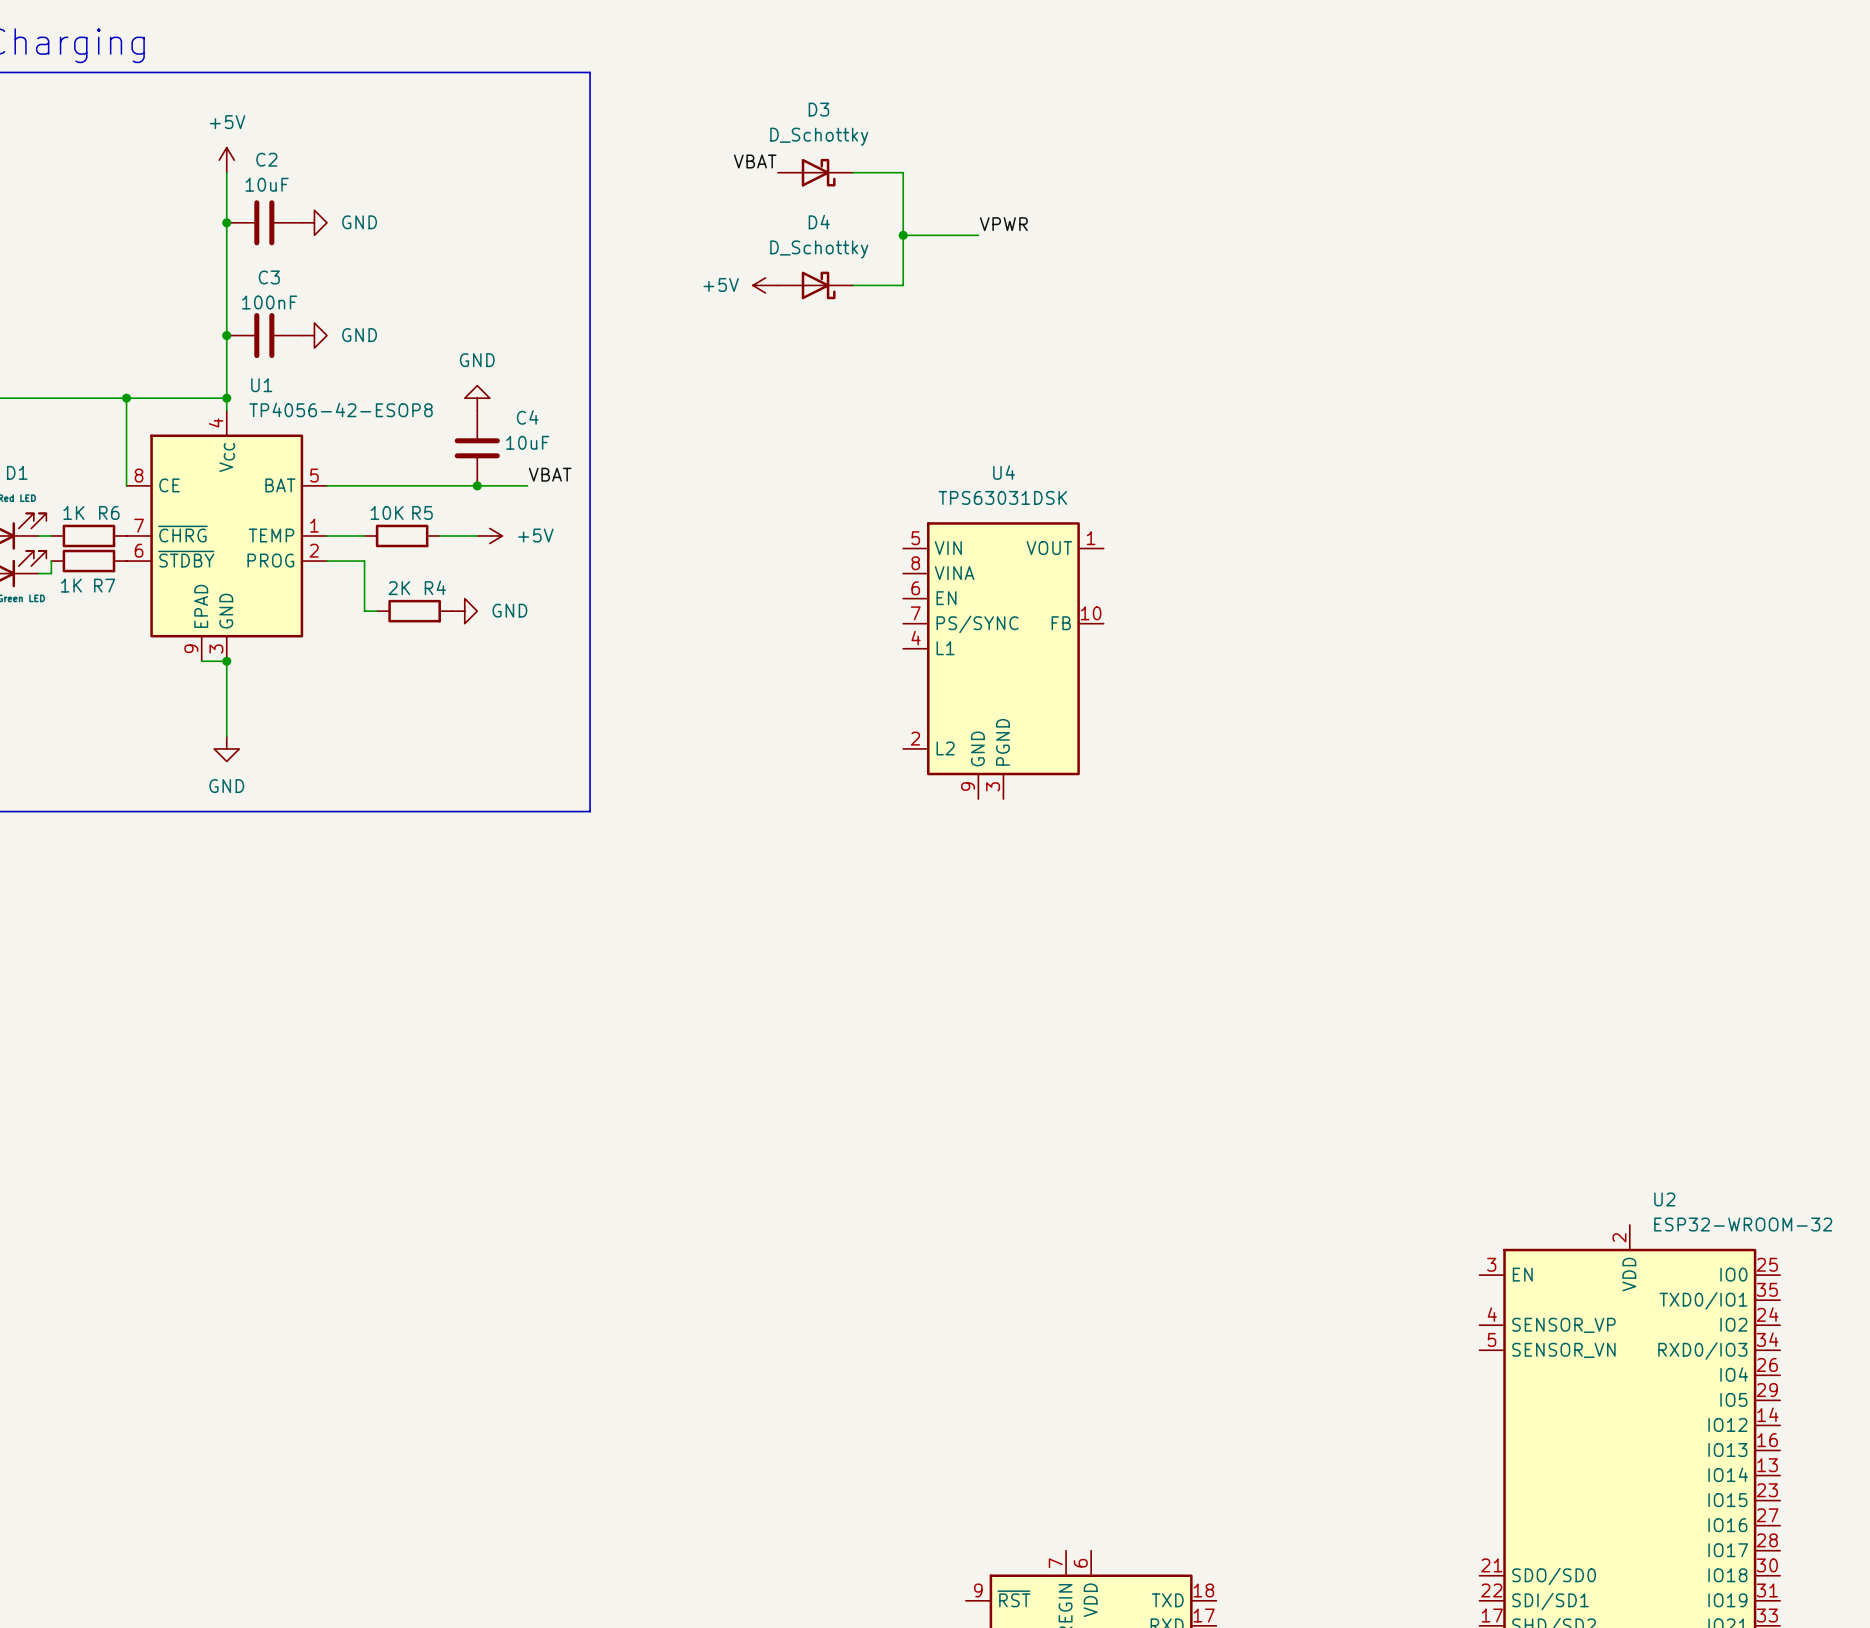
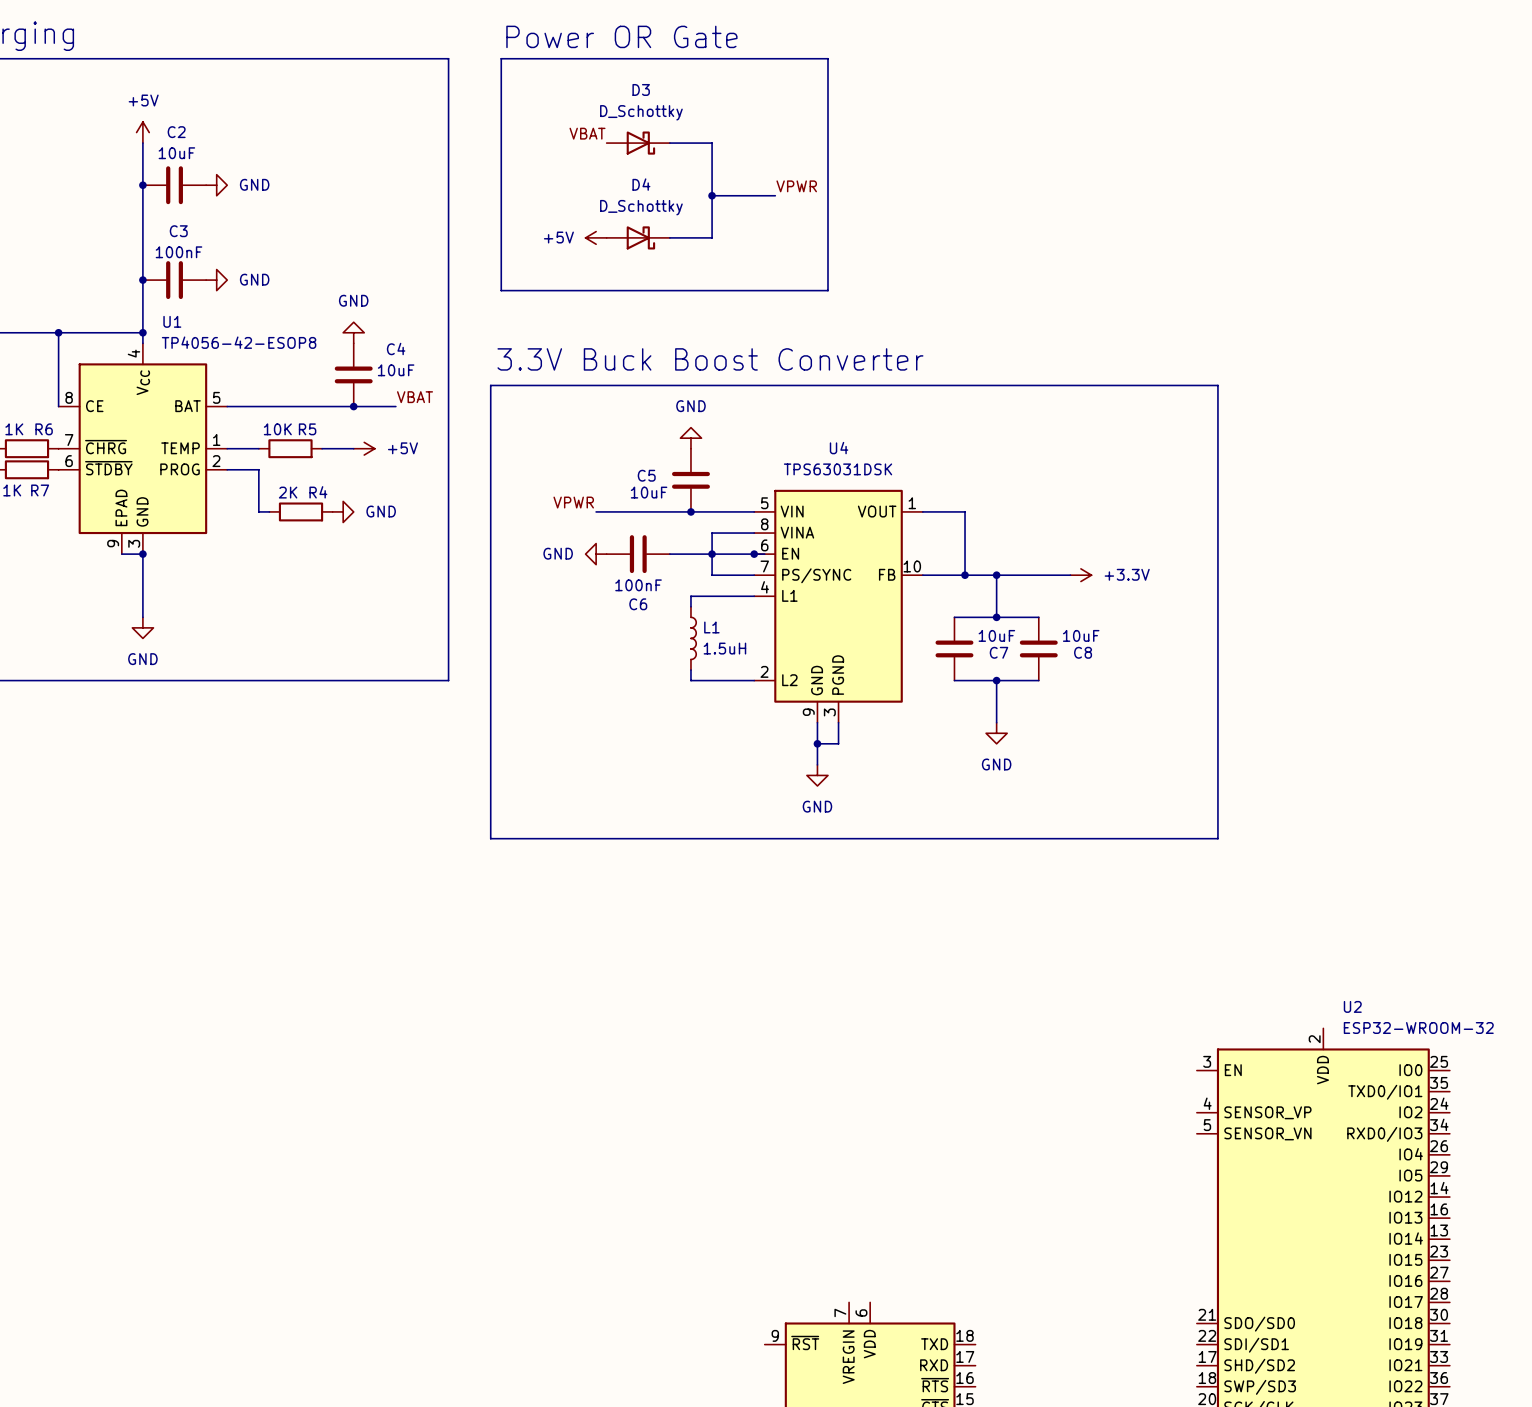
text: none -> Power OR Gate (621, 36)
line: none -> (501, 58) (827, 58) (827, 290) (501, 290) (501, 58)
text: none -> 3.3V Buck Boost Converter (710, 359)
line: none -> (490, 385) (1217, 385) (1217, 838) (490, 838) (490, 385)
power symbol: none -> GND (690, 438)
C5: none -> 10uF (690, 480)
label: none -> VPWR (573, 502)
wire: none -> (596, 511) (754, 511)
junction: none -> (690, 511)
wire: none -> (922, 511) (965, 511) (965, 575)
wire: none -> (754, 533) (712, 533) (712, 575) (754, 575)
U4 position: (1003, 660) -> (838, 606)
power symbol: none -> GND (596, 554)
C6: none -> 100nF (638, 554)
wire: none -> (669, 554) (764, 554)
junction: none -> (712, 554)
junction: none -> (754, 554)
wire: none -> (922, 575) (1070, 575)
junction: none -> (965, 575)
wire: none -> (996, 575) (996, 617)
junction: none -> (996, 575)
power symbol: none -> +3.3V (1080, 575)
wire: none -> (754, 596) (690, 596) (690, 606)
wire: none -> (954, 617) (1038, 617)
junction: none -> (996, 617)
L1: none -> 1.5uH (693, 638)
C7: none -> 10uF (954, 648)
C8: none -> 10uF (1038, 648)
wire: none -> (690, 670) (690, 680) (754, 680)
wire: none -> (954, 680) (1038, 680)
wire: none -> (996, 680) (996, 722)
junction: none -> (996, 680)
wire: none -> (817, 722) (817, 764)
wire: none -> (838, 722) (838, 743) (817, 743)
power symbol: none -> GND (996, 733)
junction: none -> (817, 743)
power symbol: none -> GND (817, 775)

